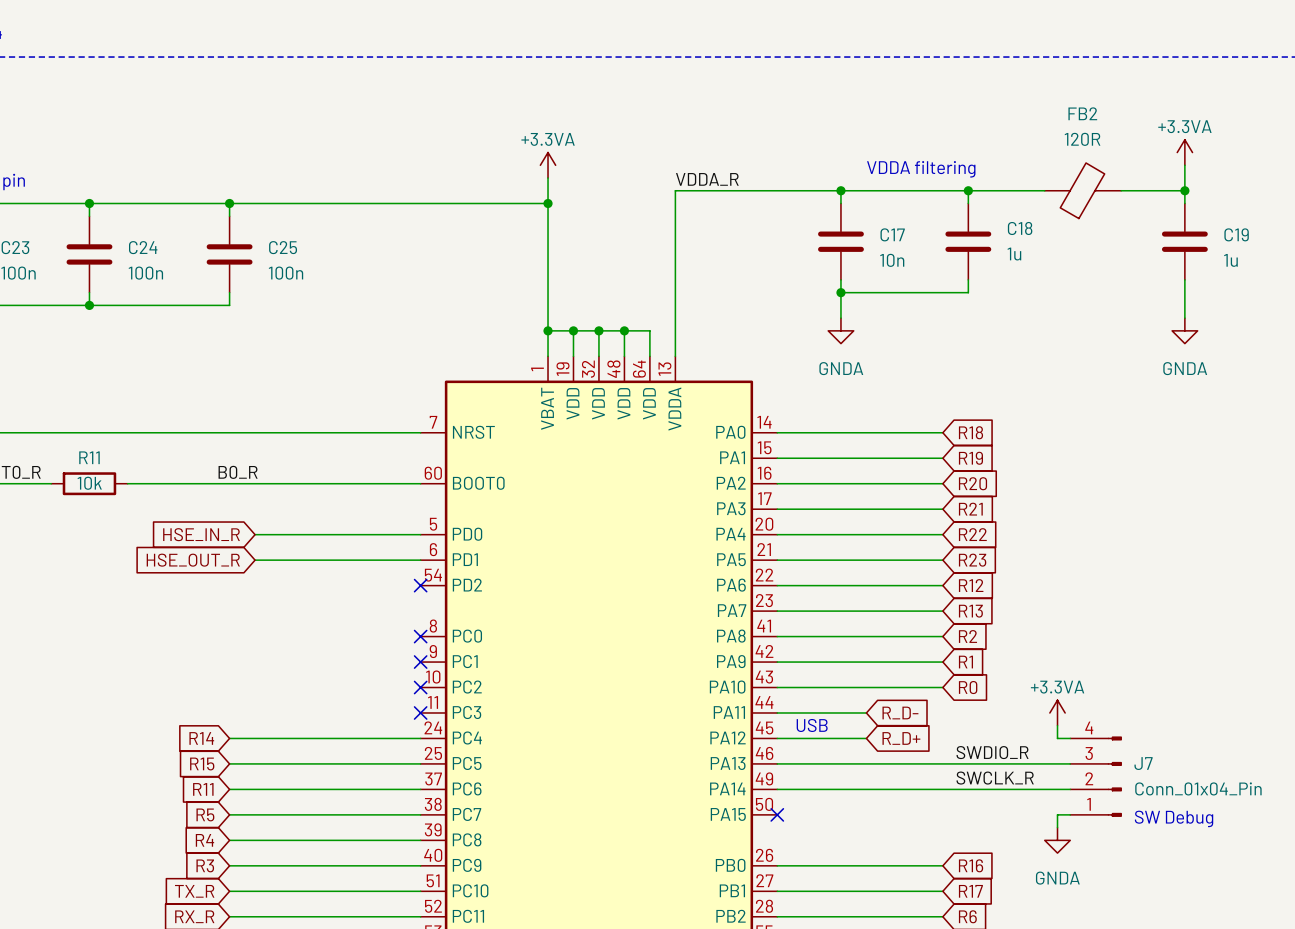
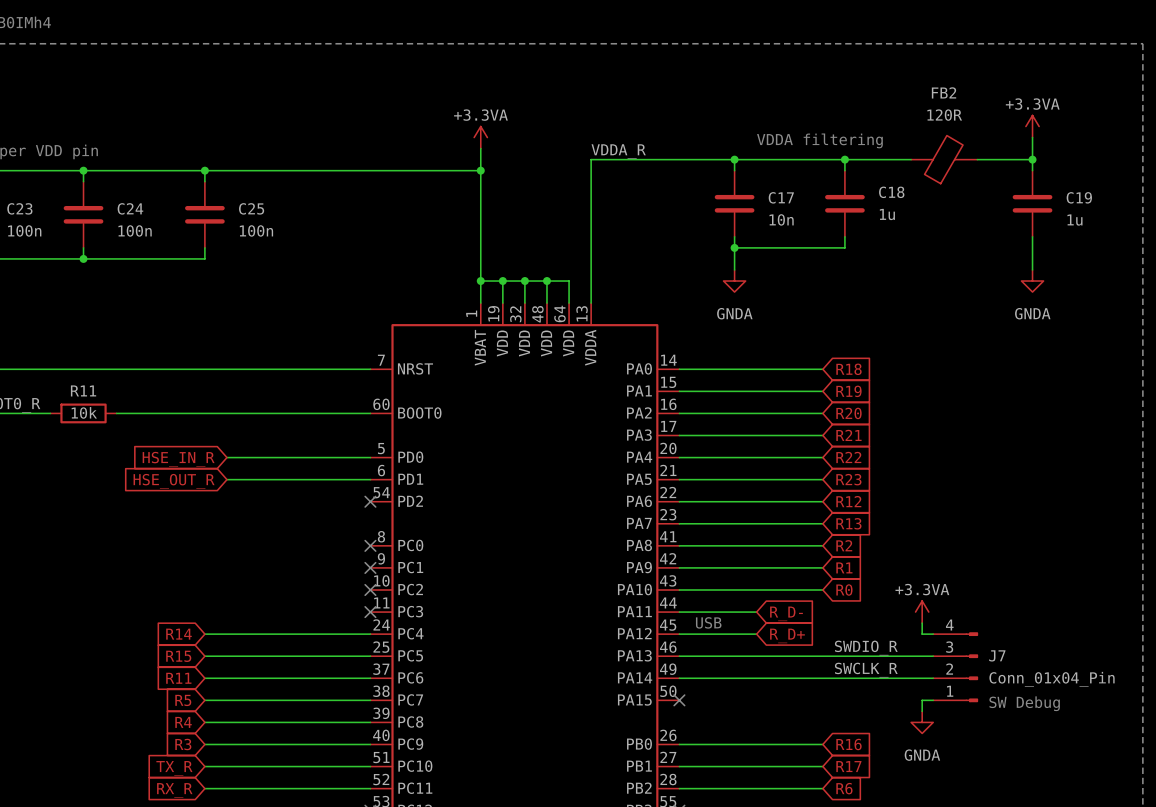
label: B0_R (238, 472) -> none

